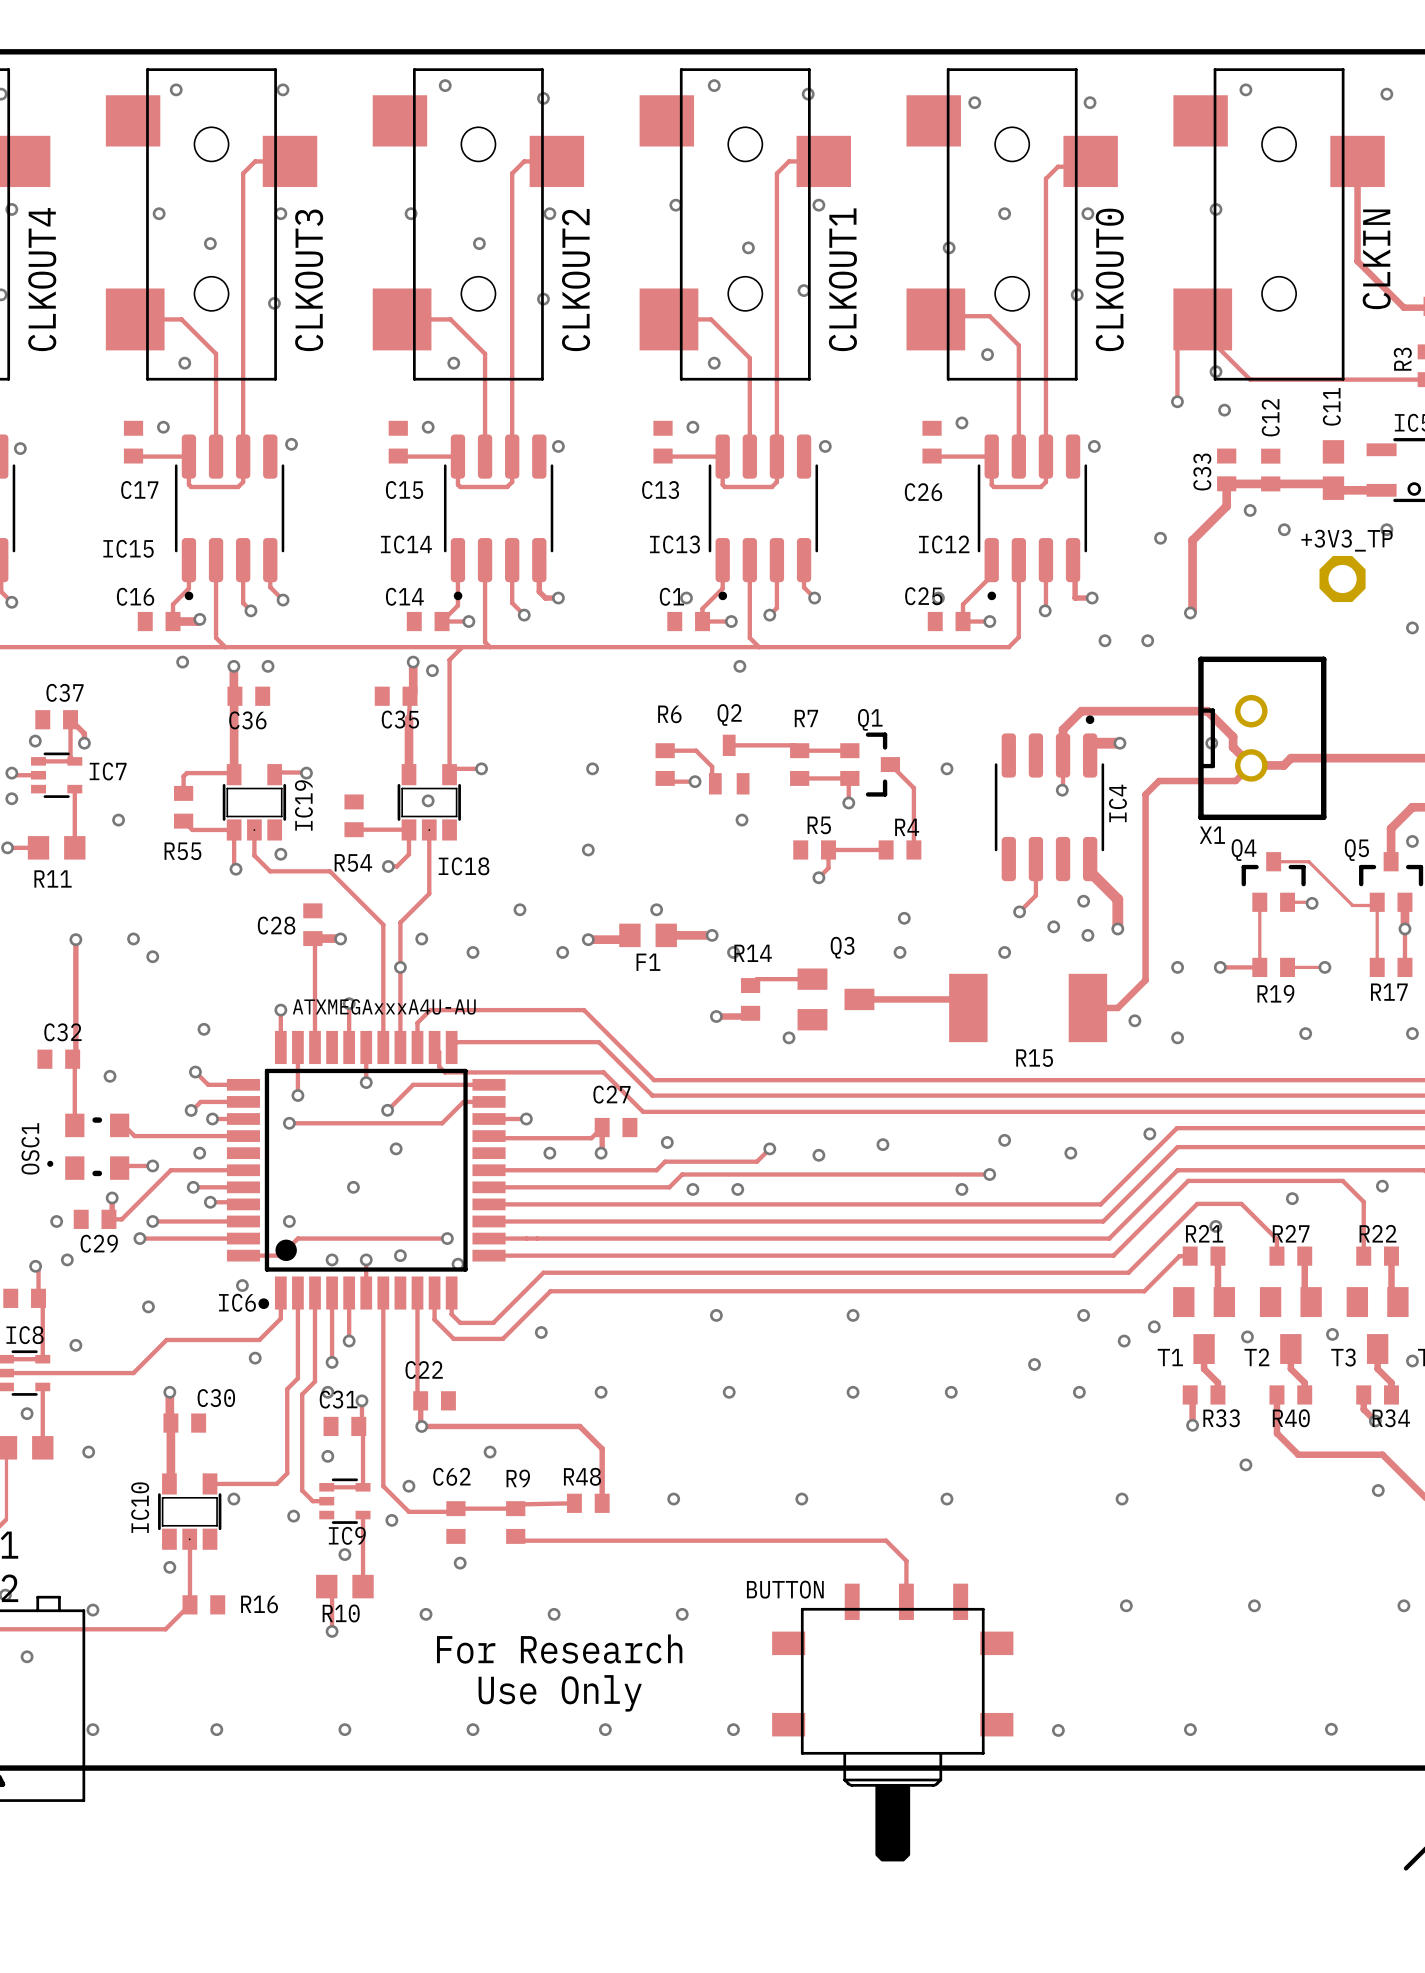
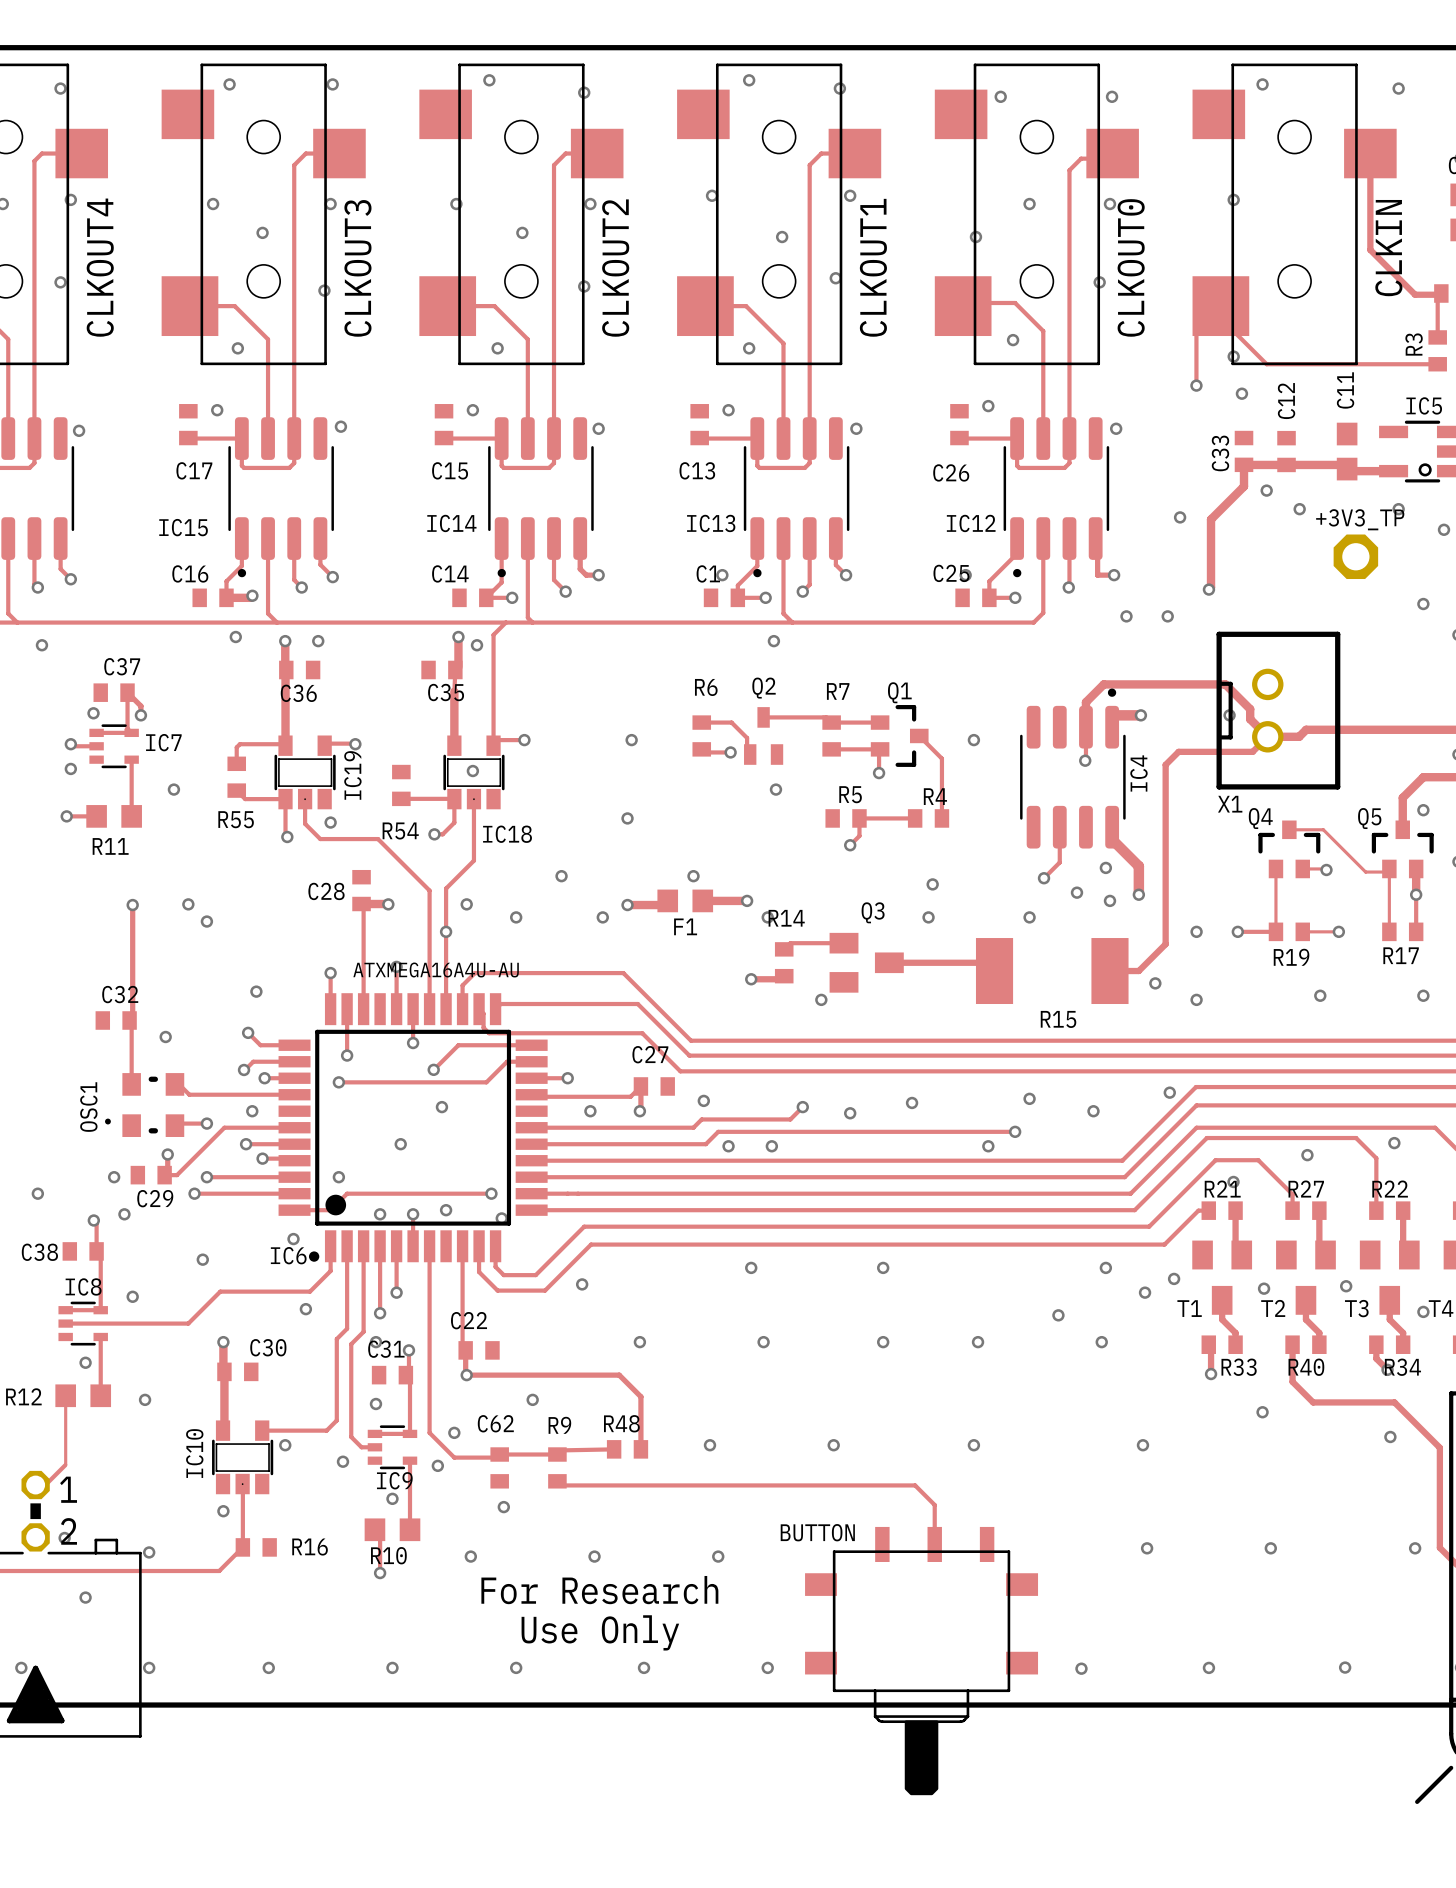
IC6 value: ATXMEGAxxxA4U-AU (384, 1006) -> ATXMEGA16A4U-AU (436, 969)

